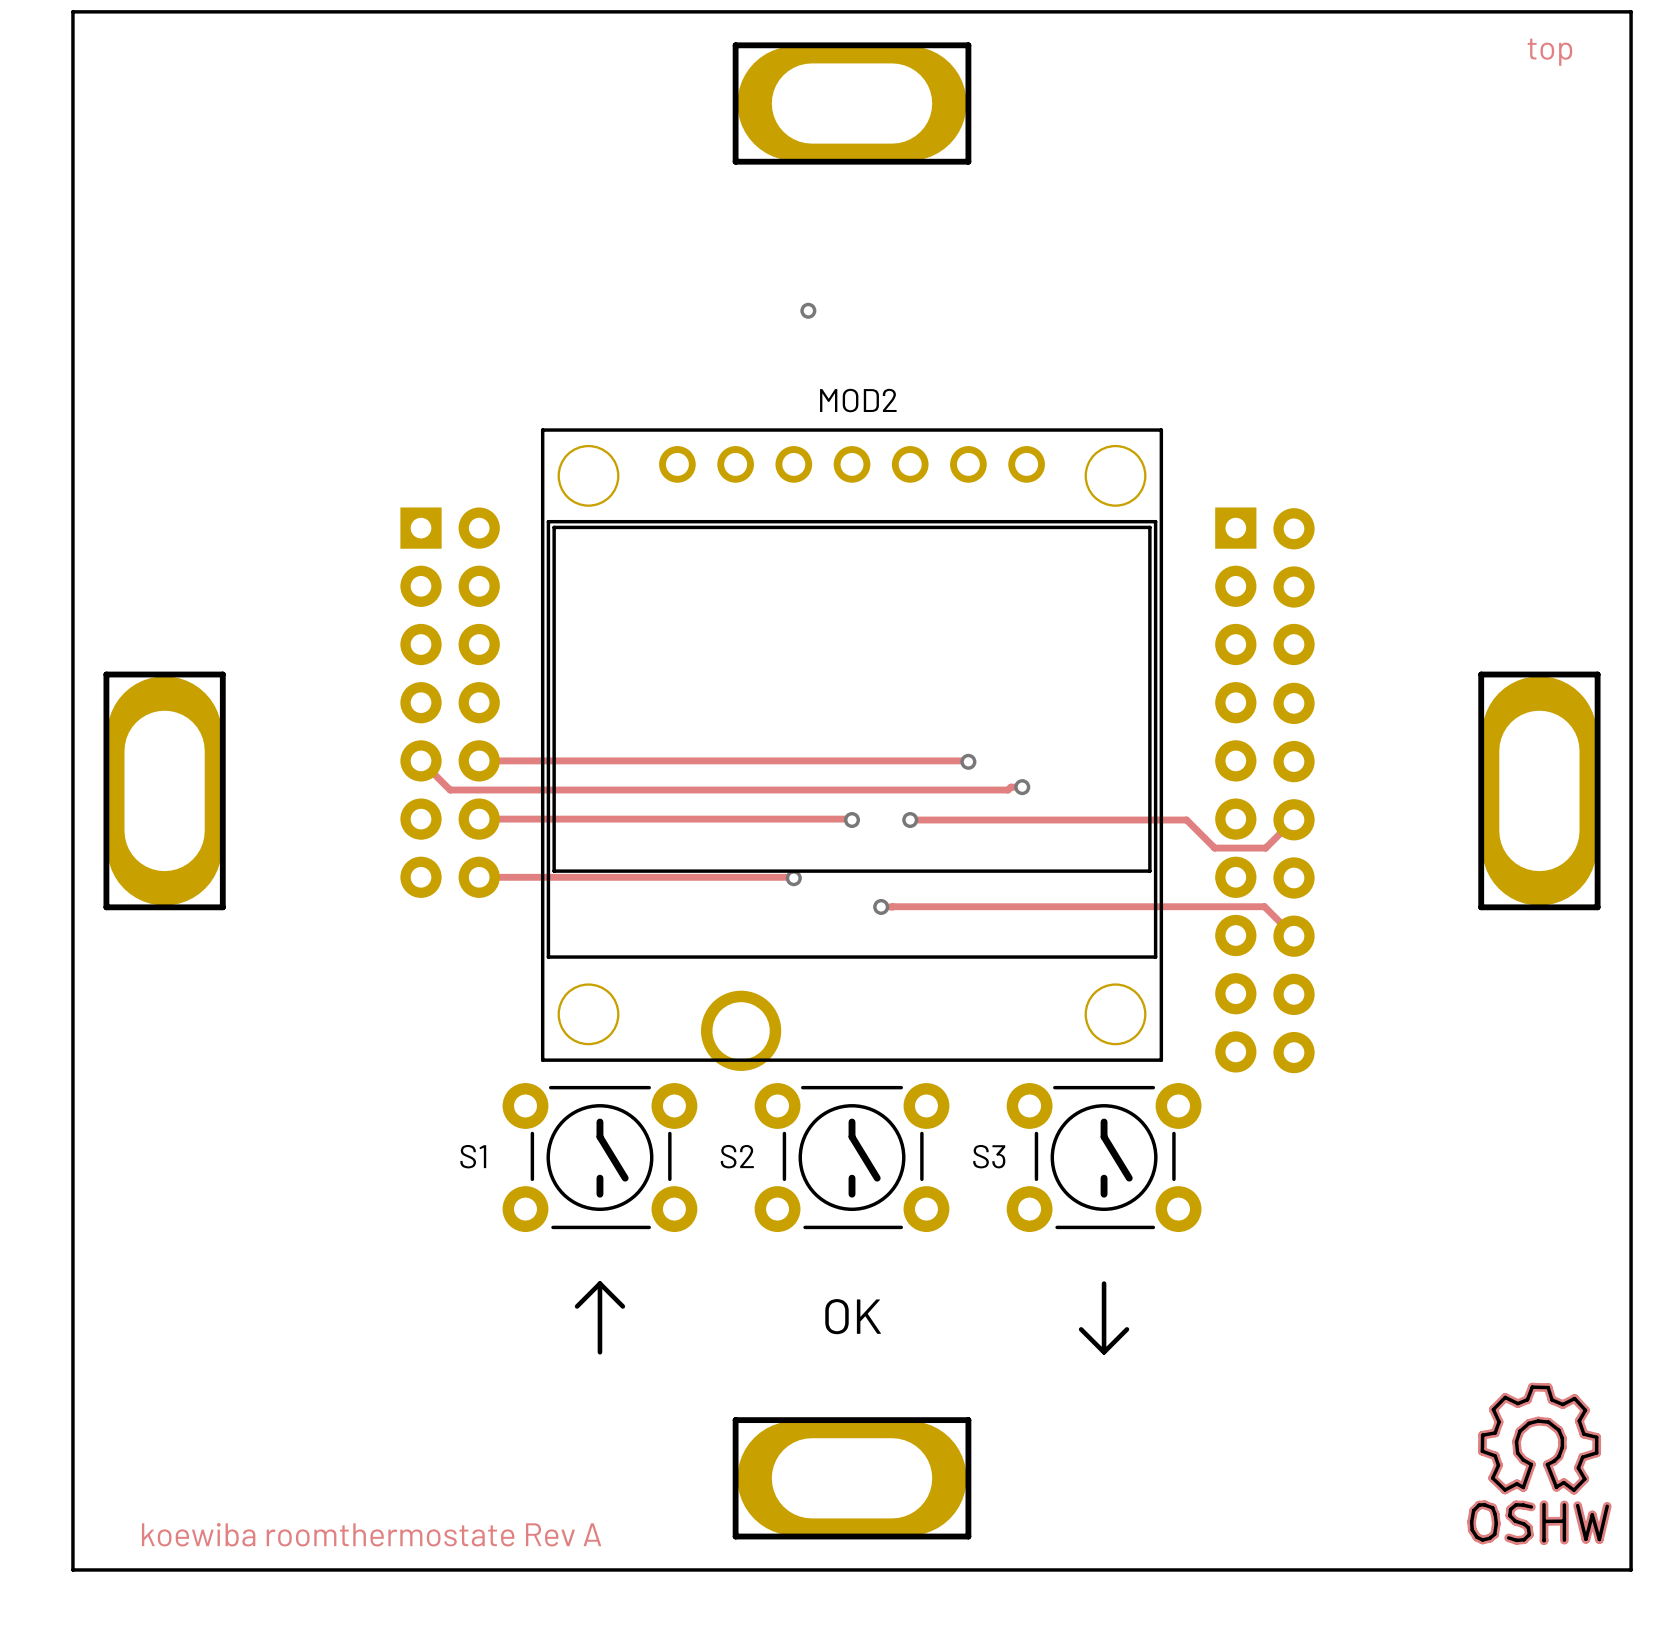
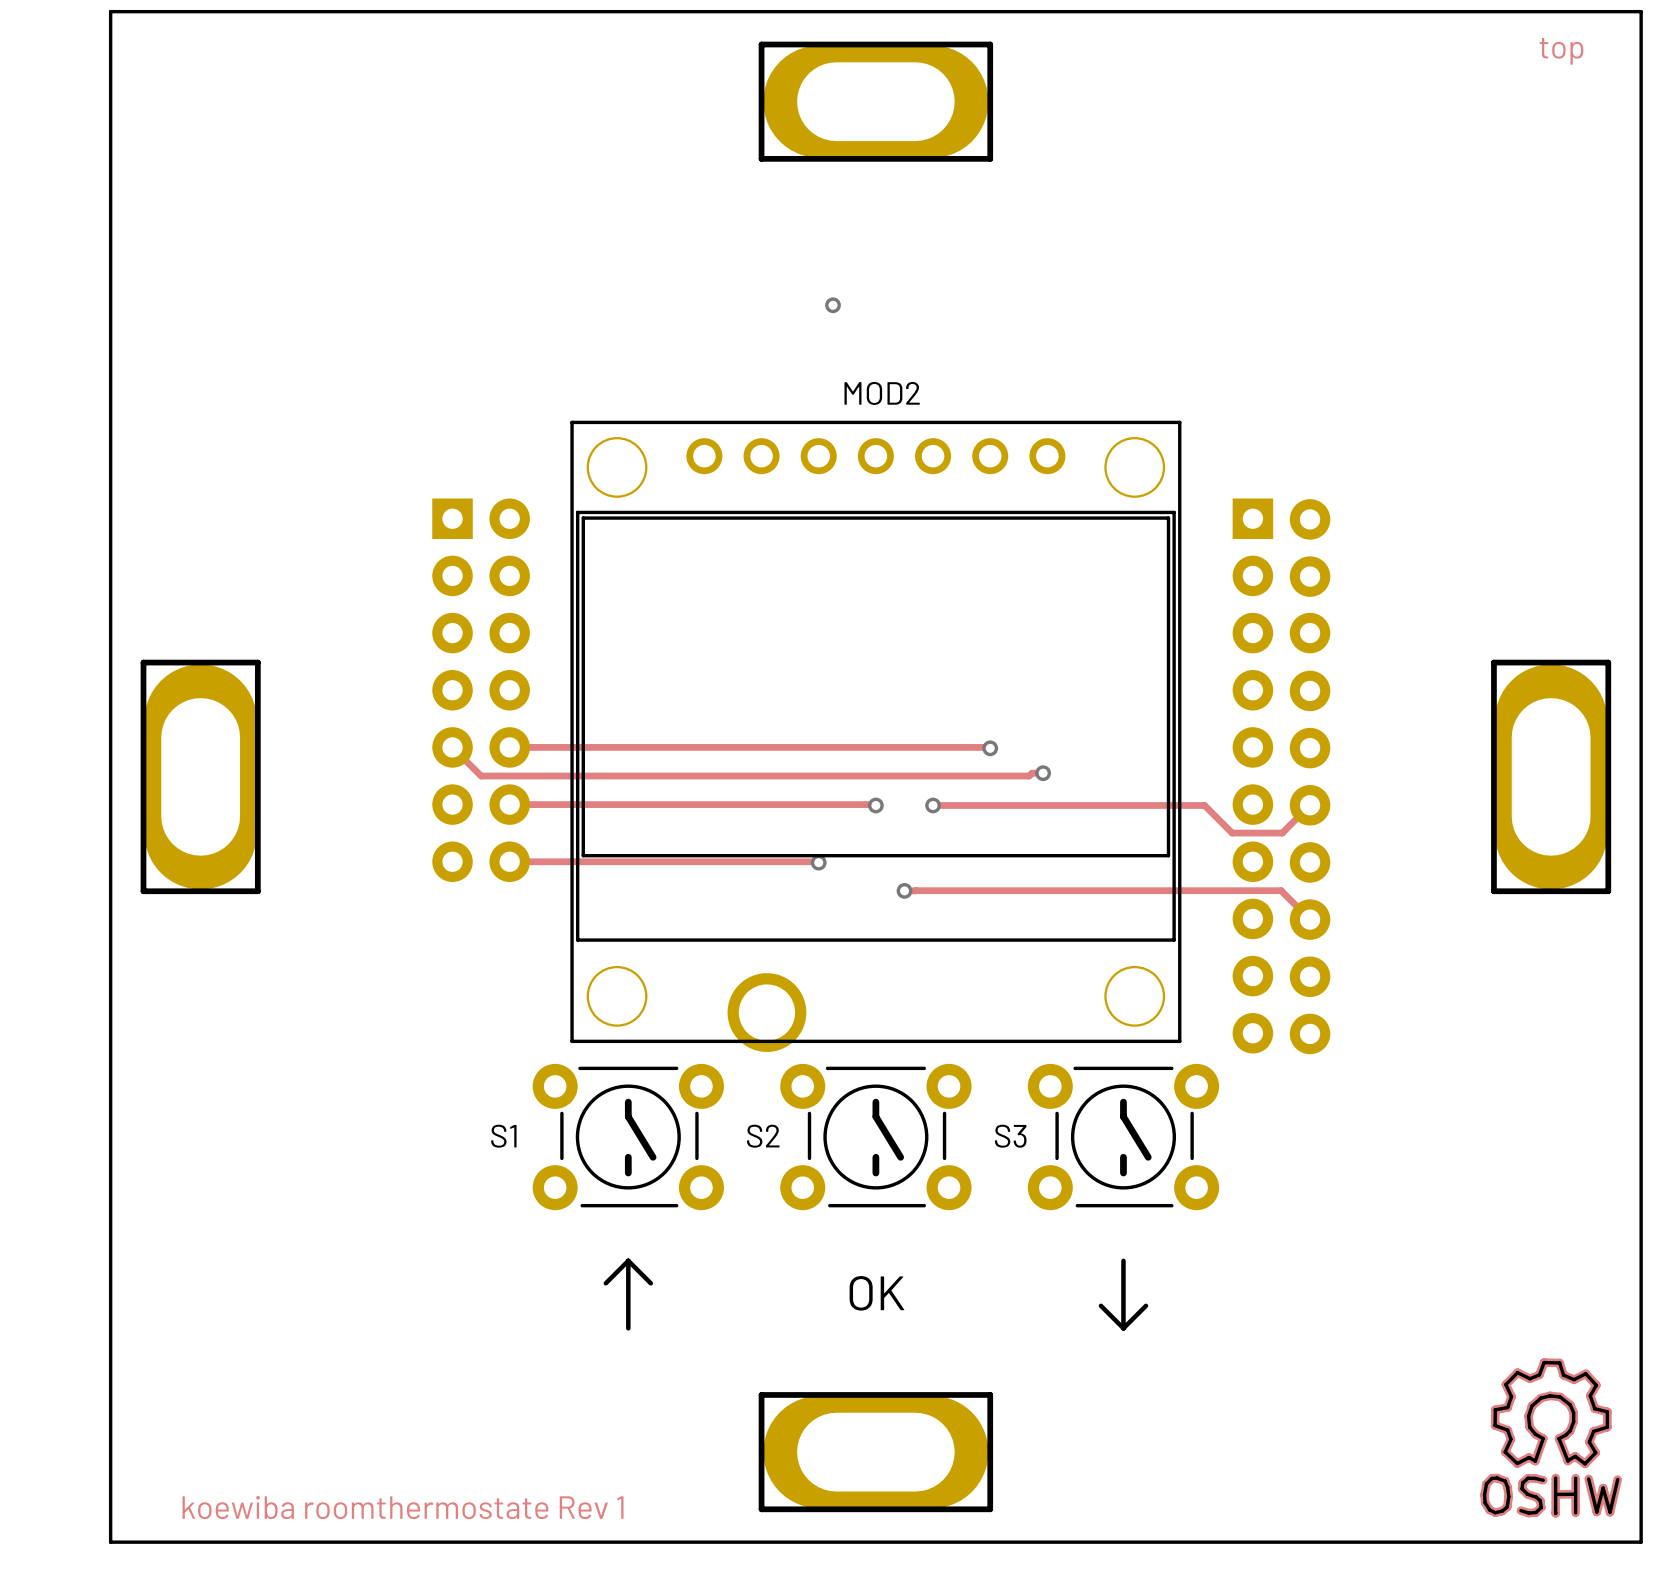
text: koewiba roomthermostate Rev A (371, 1534) -> koewiba roomthermostate Rev 1 (403, 1507)

